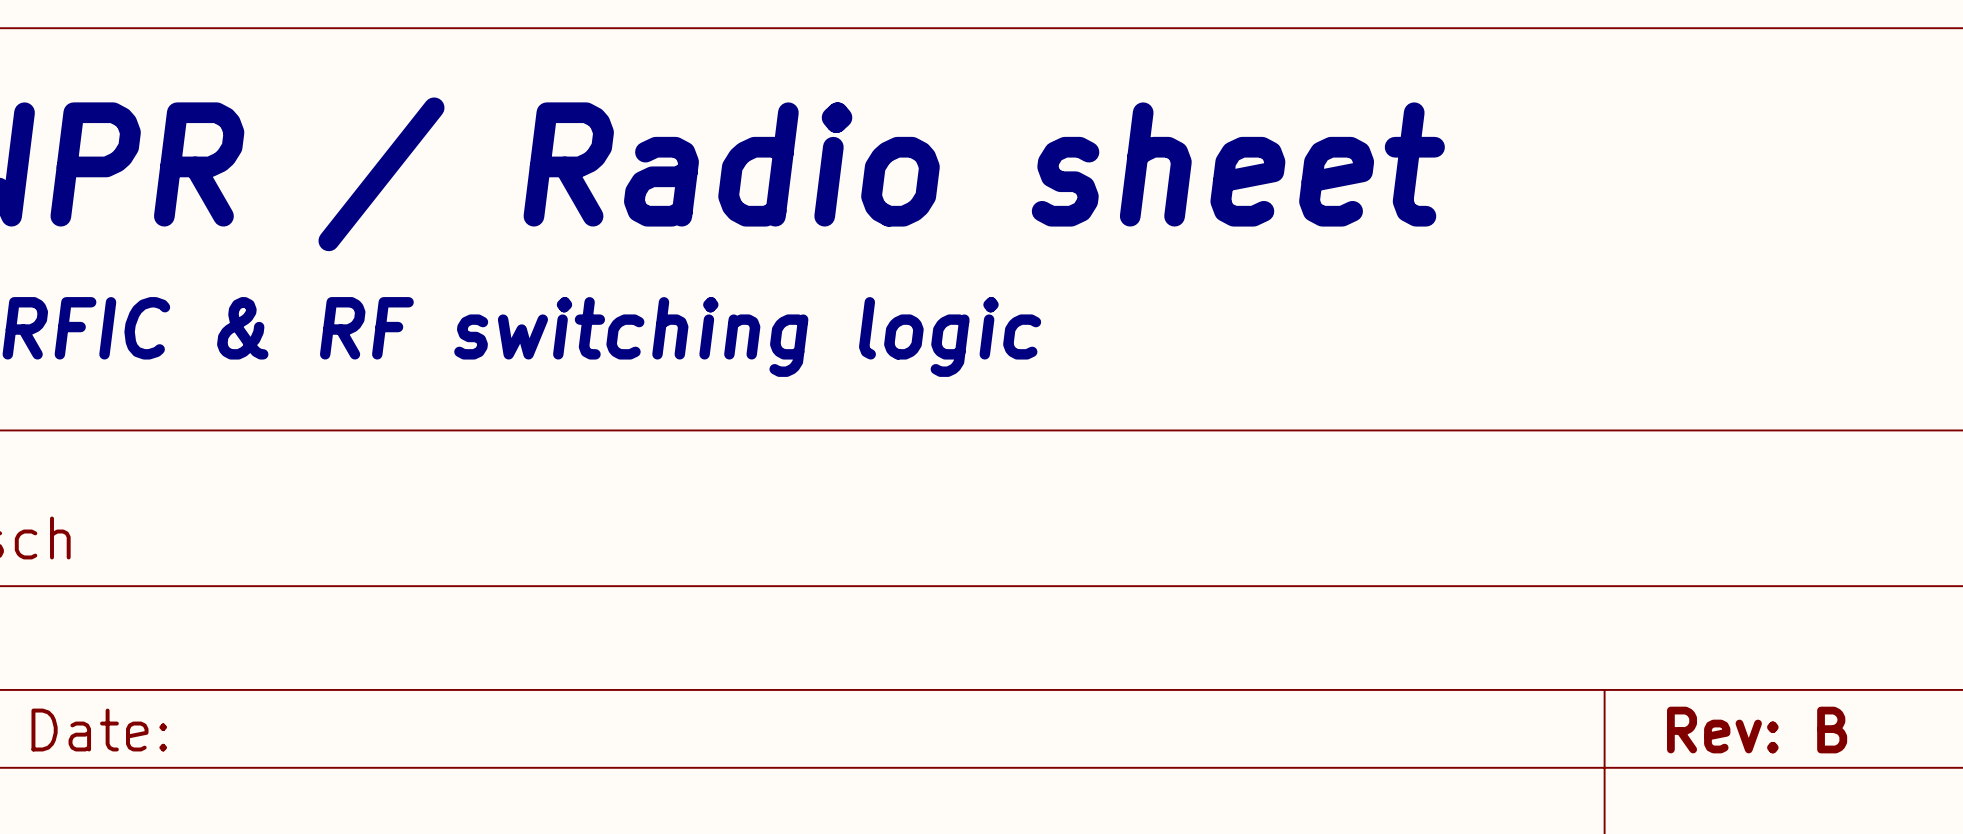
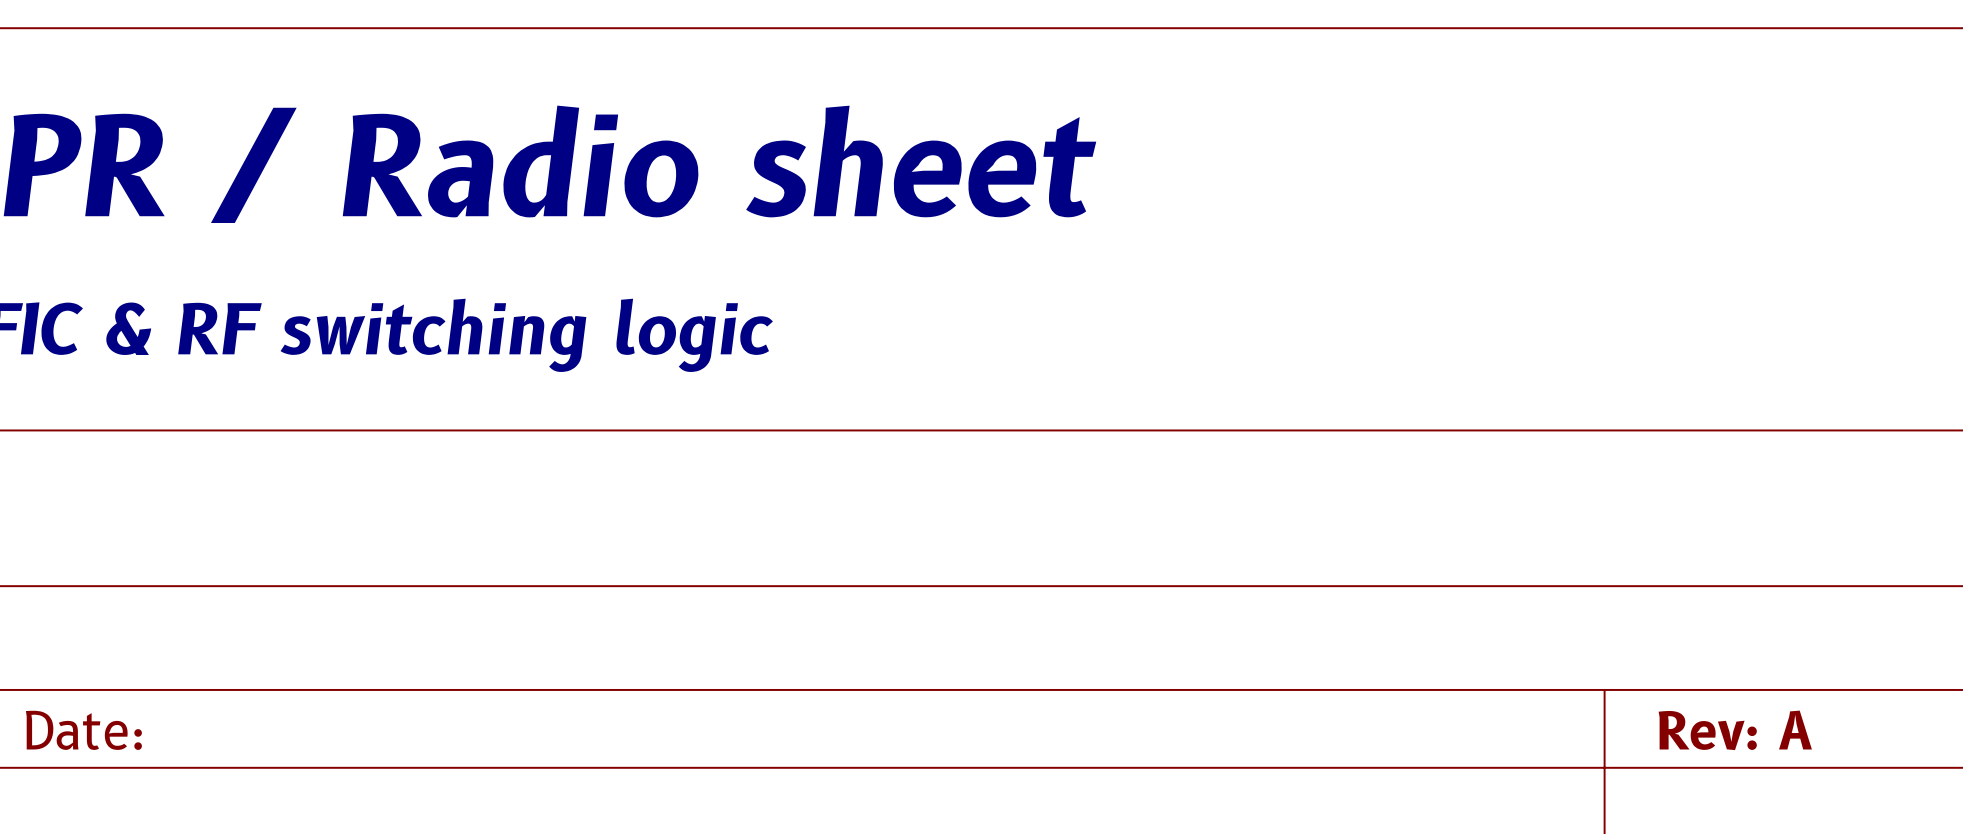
title block: Rev: B (1757, 730) -> Rev: A (1735, 730)

